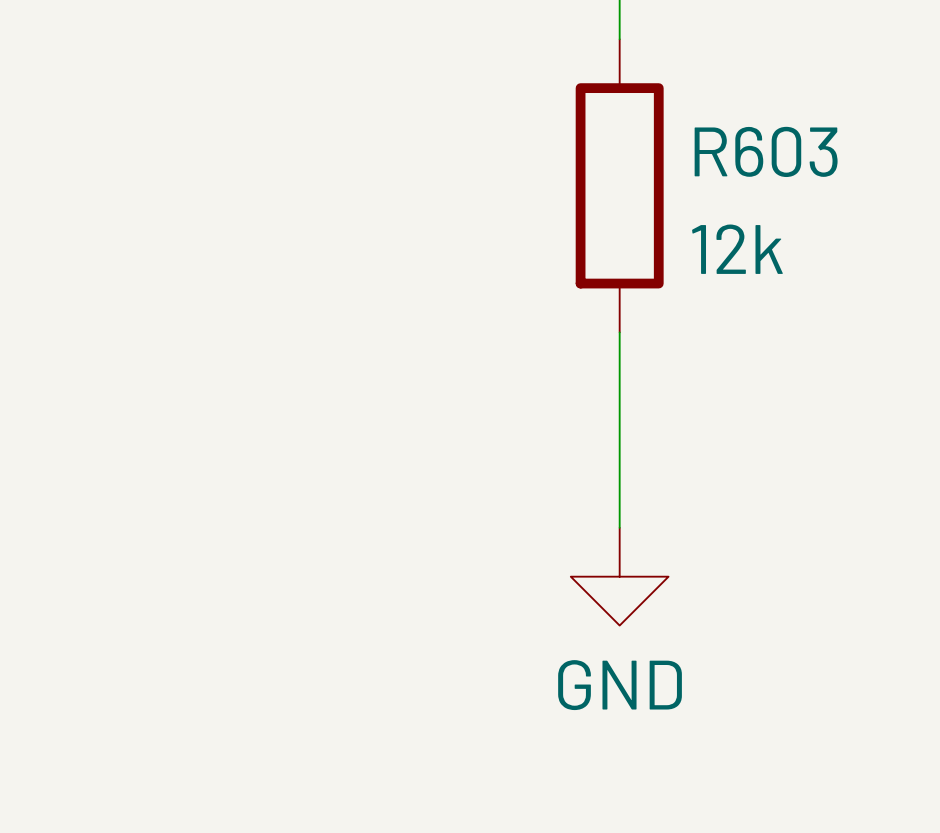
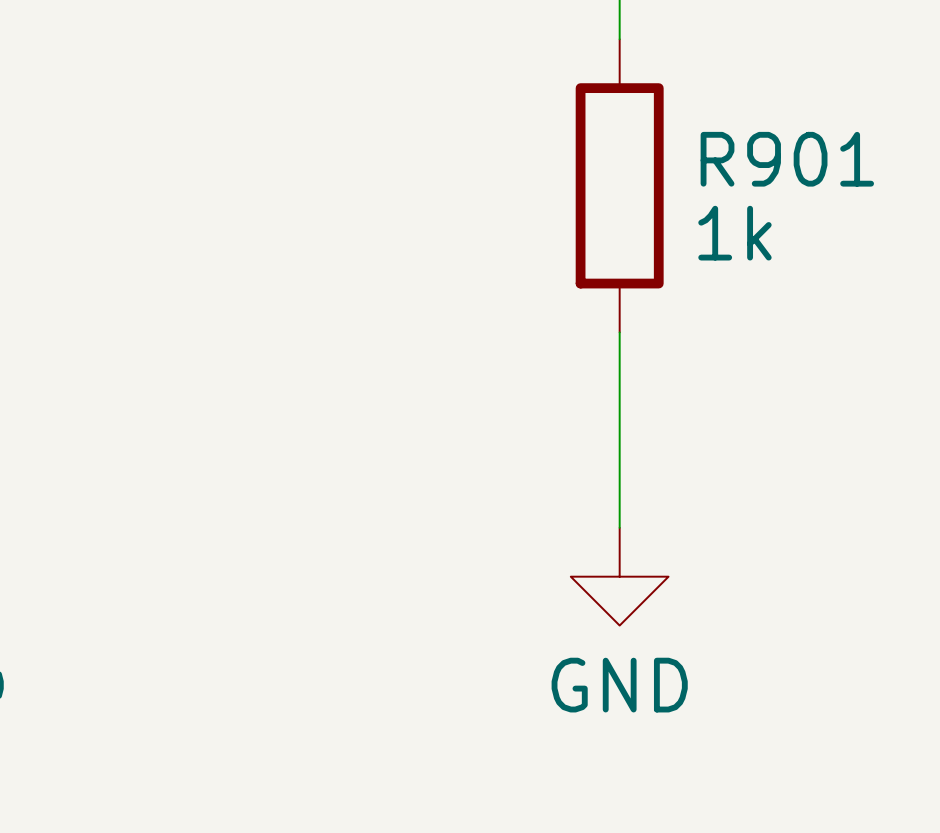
R603 name: R603 (766, 151) -> R901 (787, 159)
R603 value: 12k (737, 249) -> 1k (734, 233)

